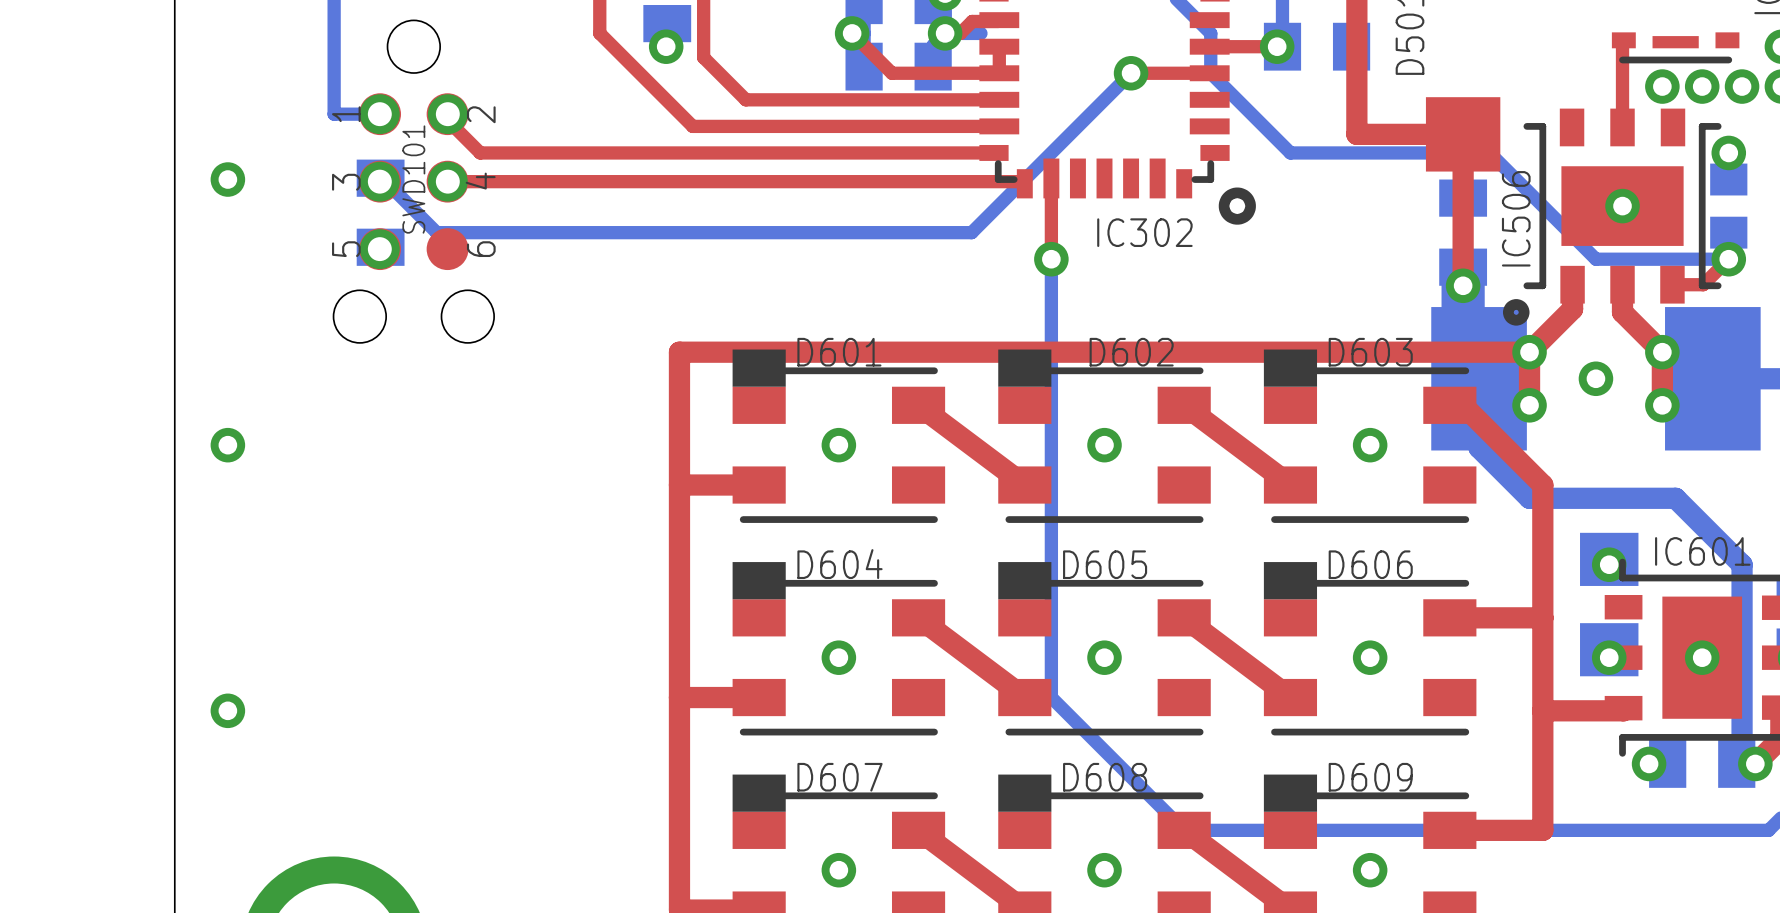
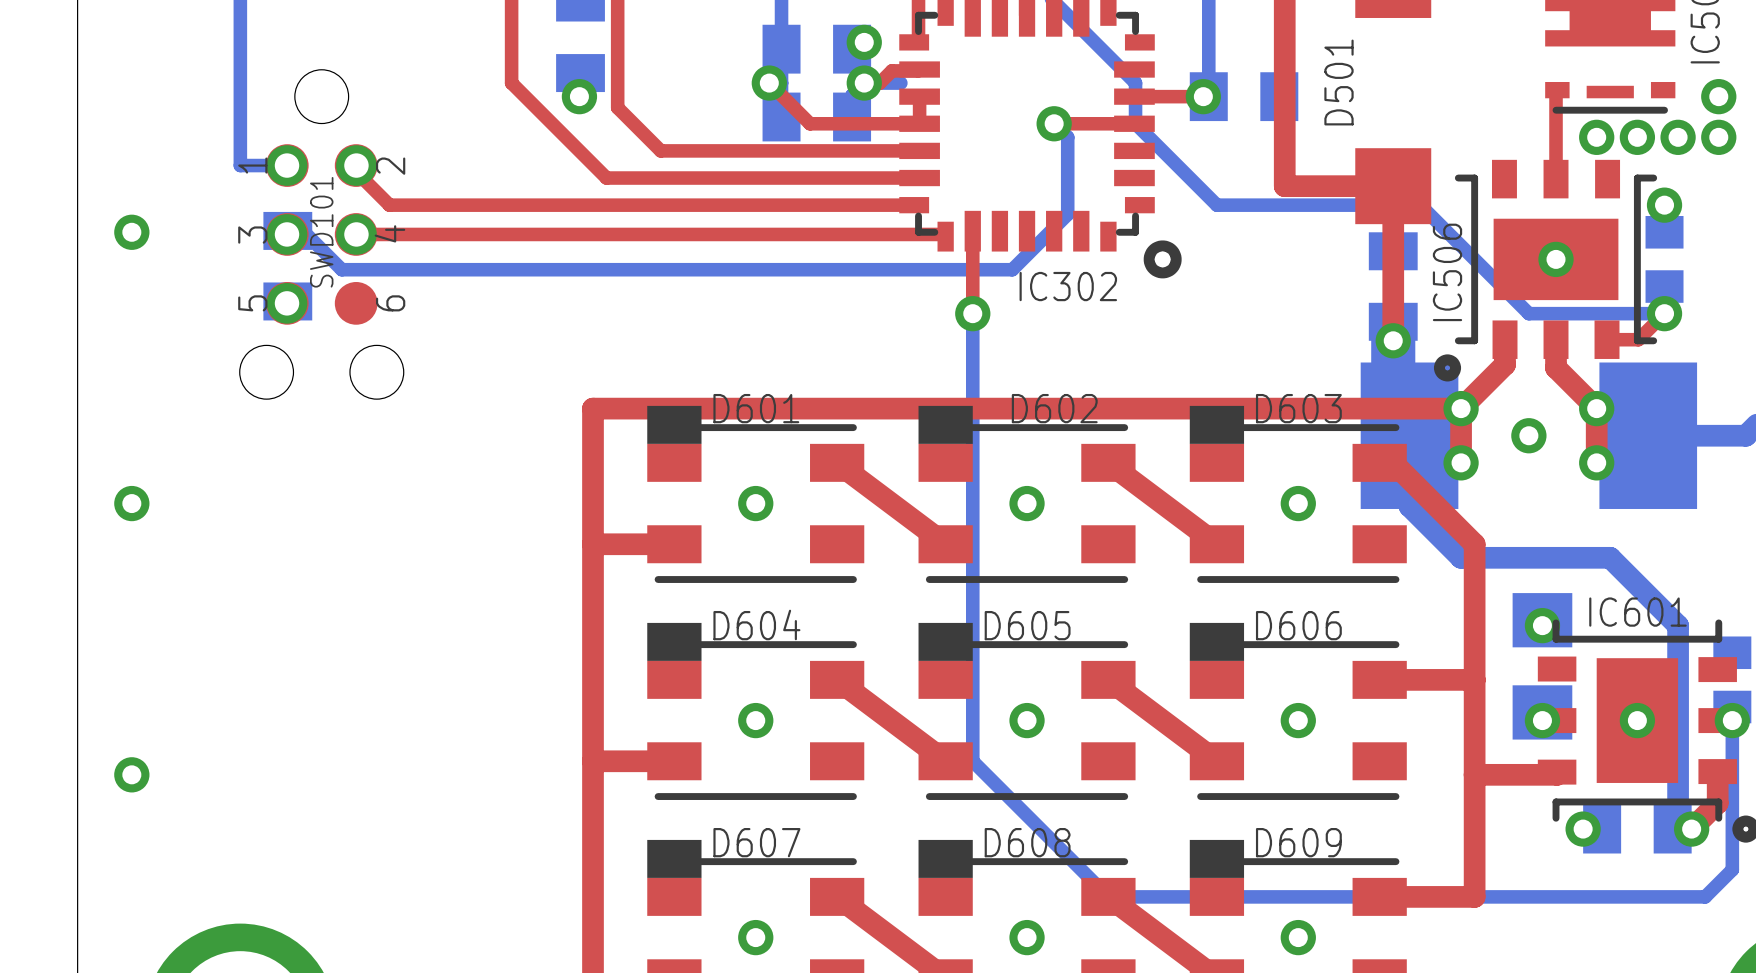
bottom track: (1131, 73) (971, 232) (436, 232) (382, 178) -> (1054, 123) (1067, 137) (1067, 214) (1012, 269) (341, 269) (303, 230) (289, 230)

